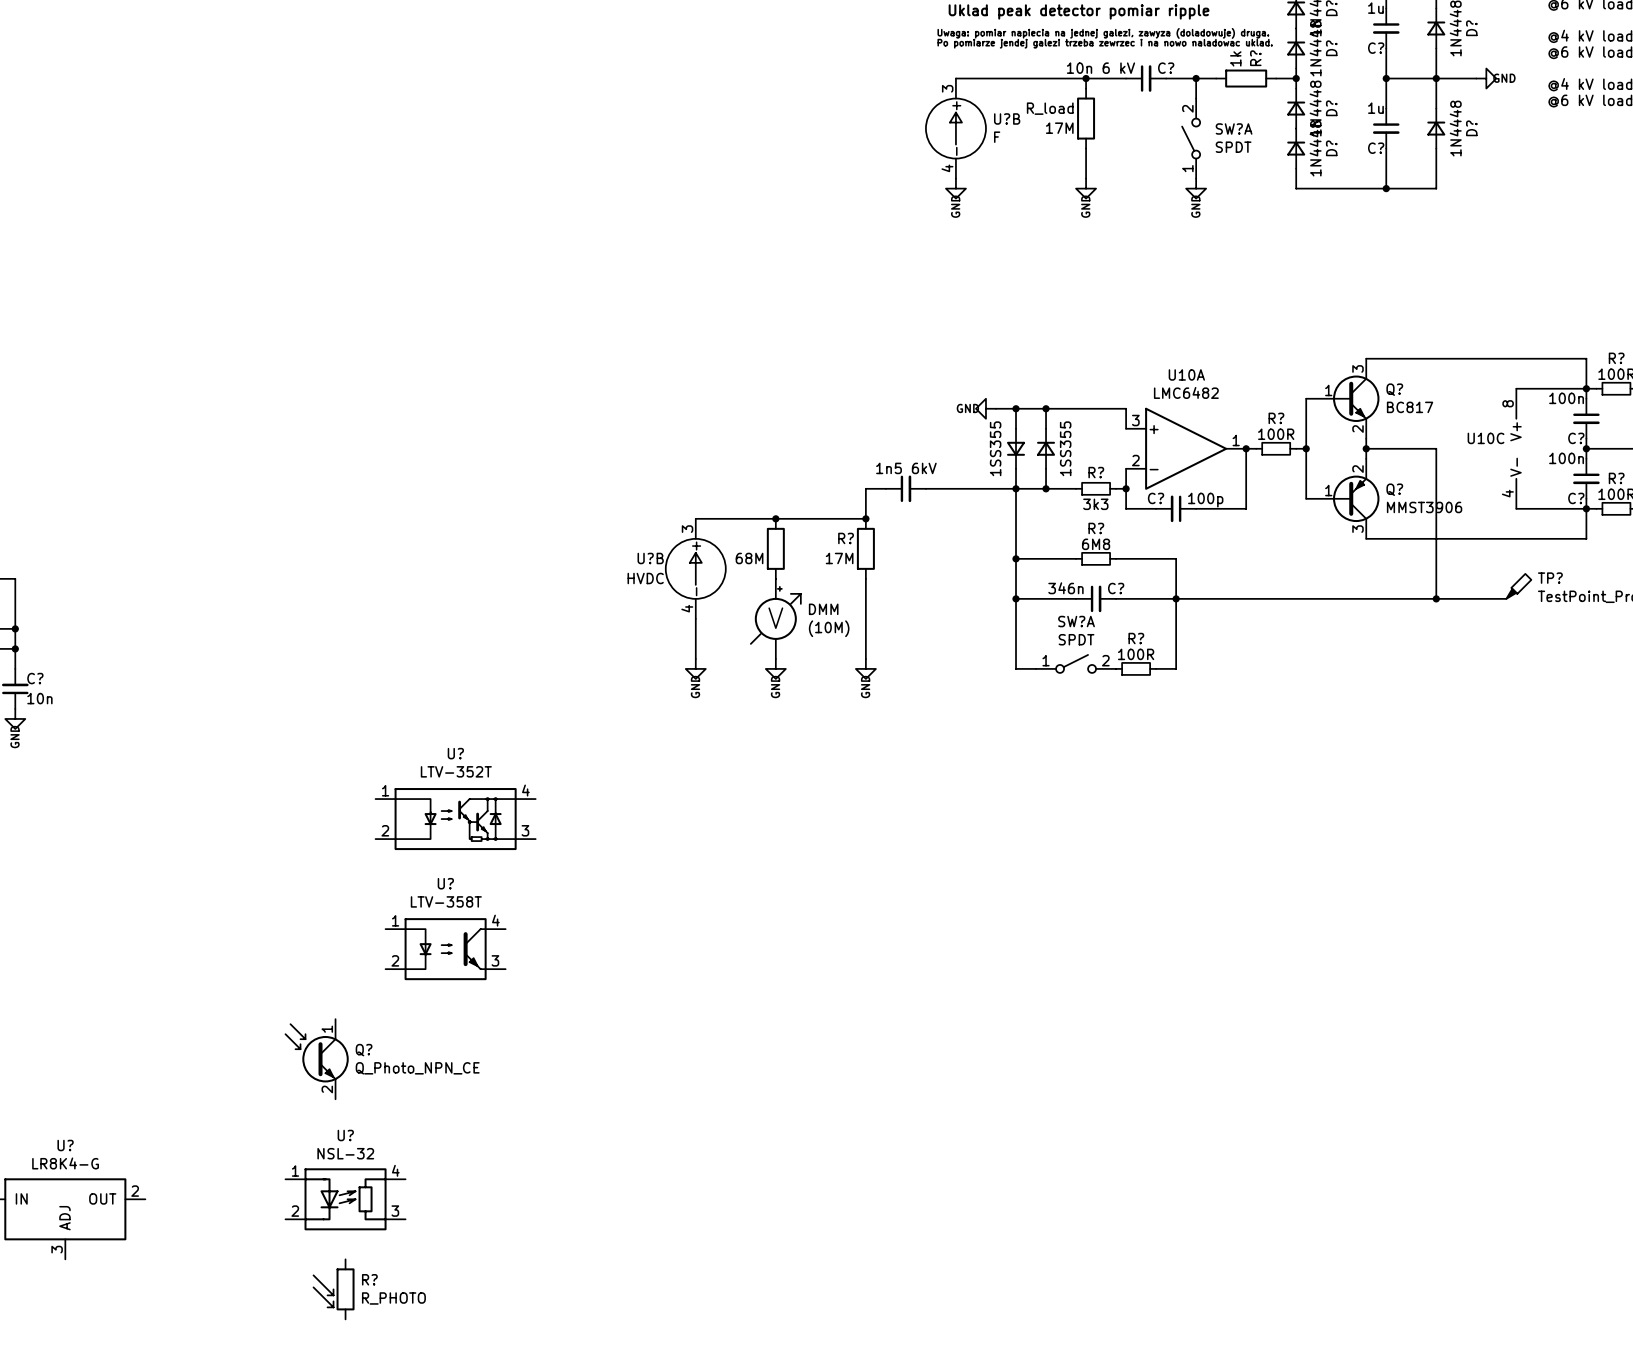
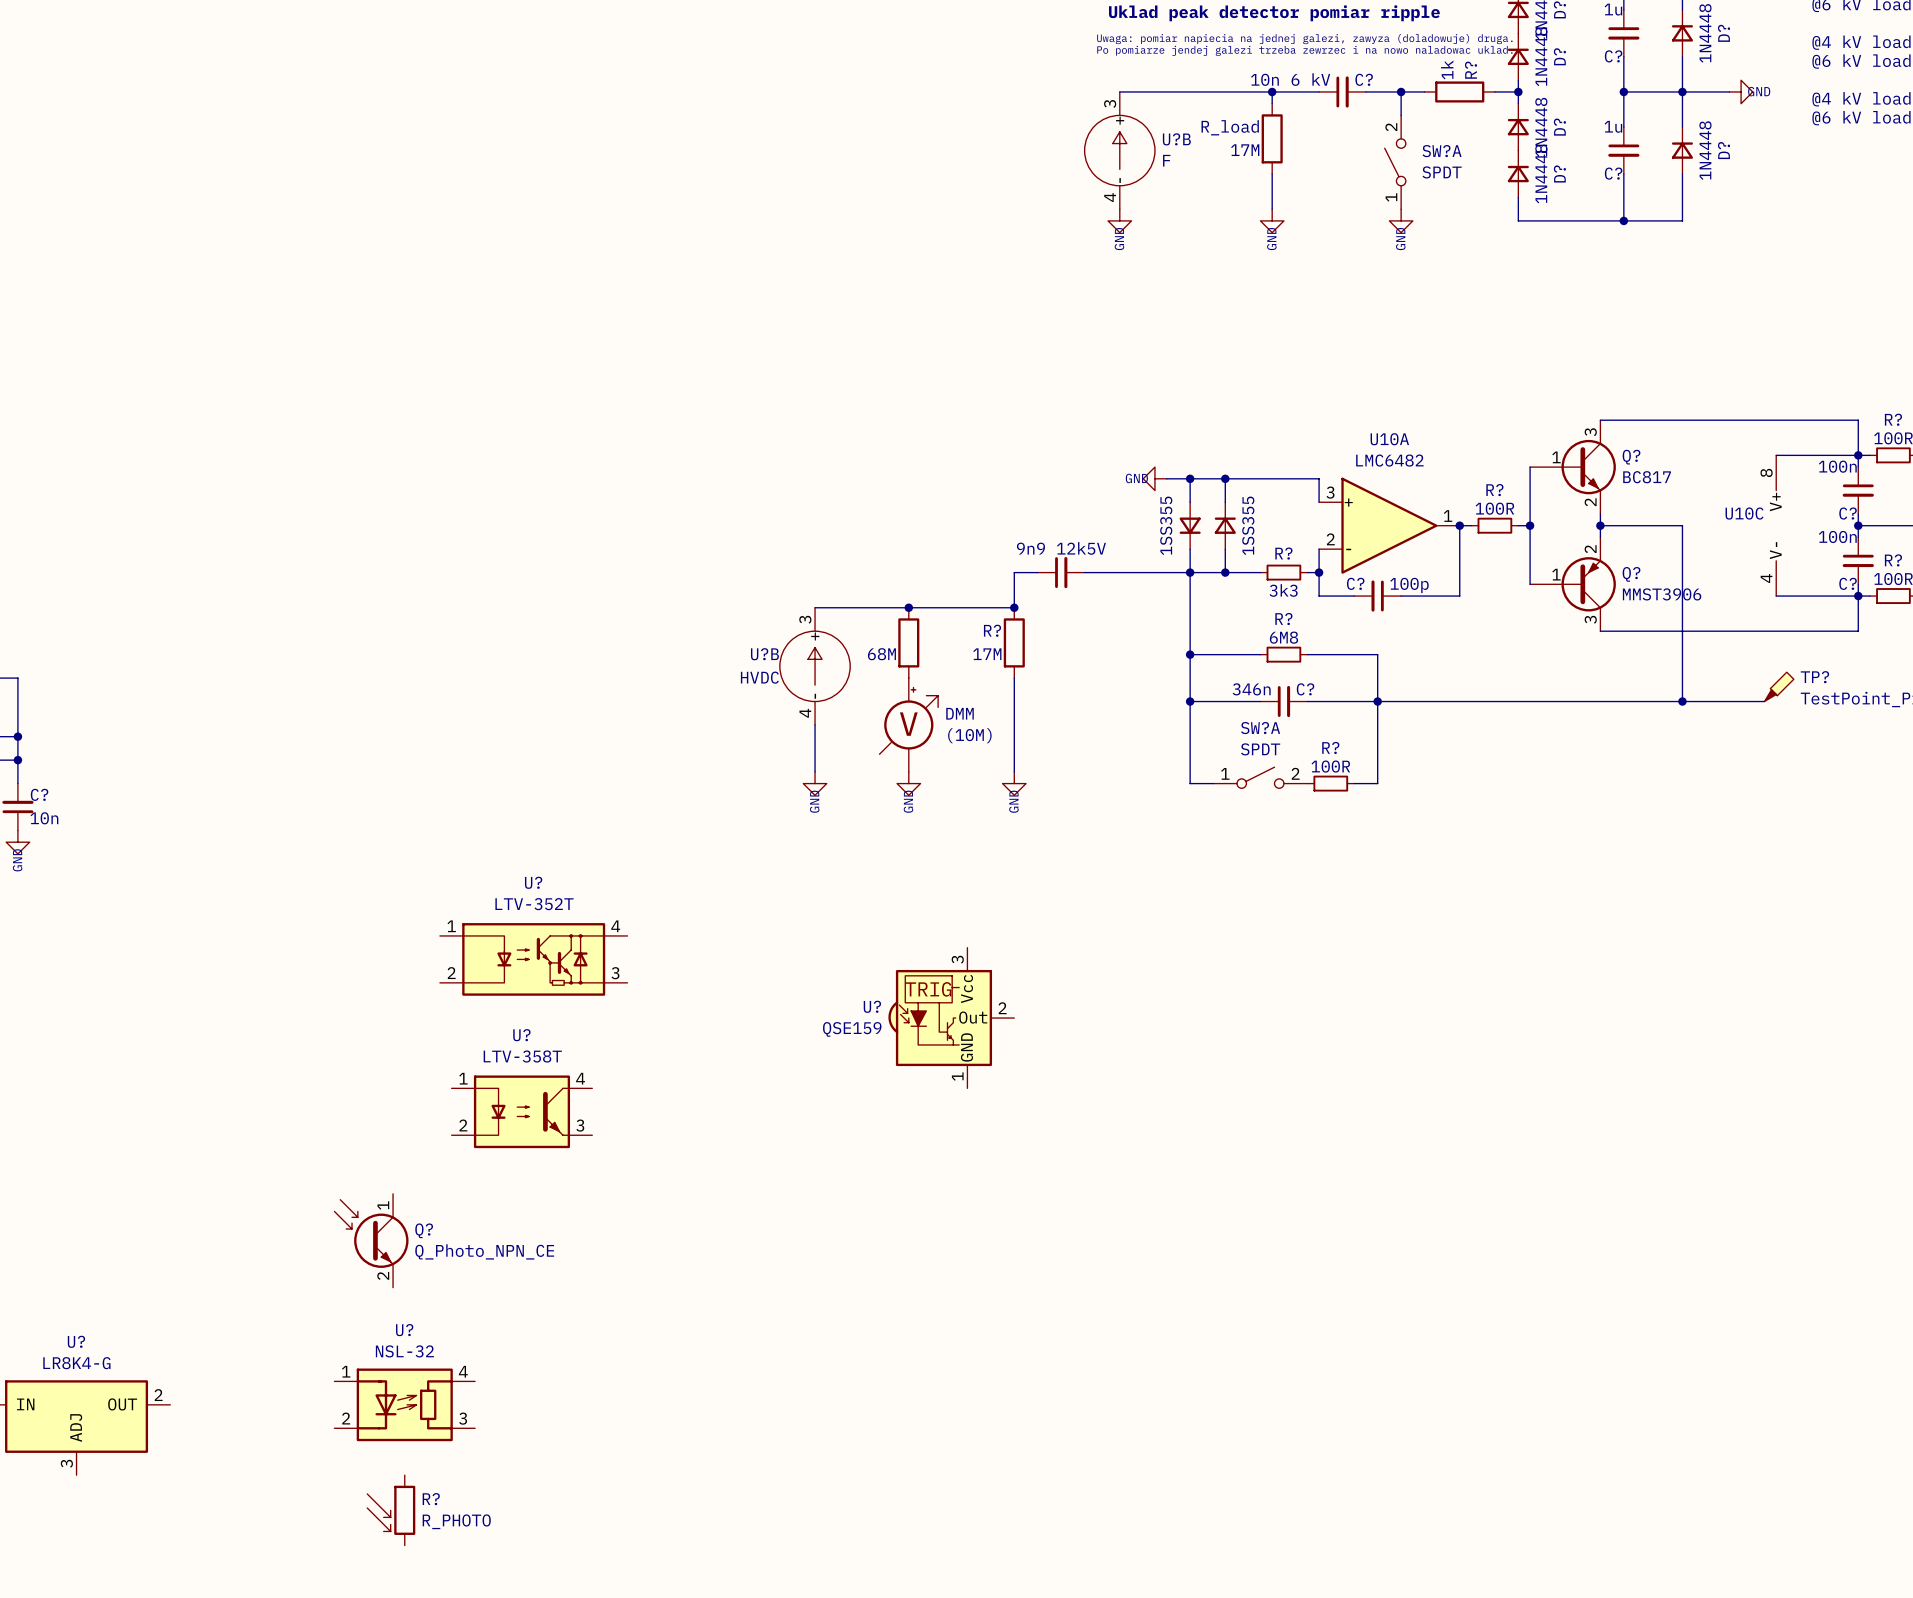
part value: 1n5 6kV (906, 468) -> 9n9 12k5V (1061, 548)
U?: none -> QSE159 (951, 1018)

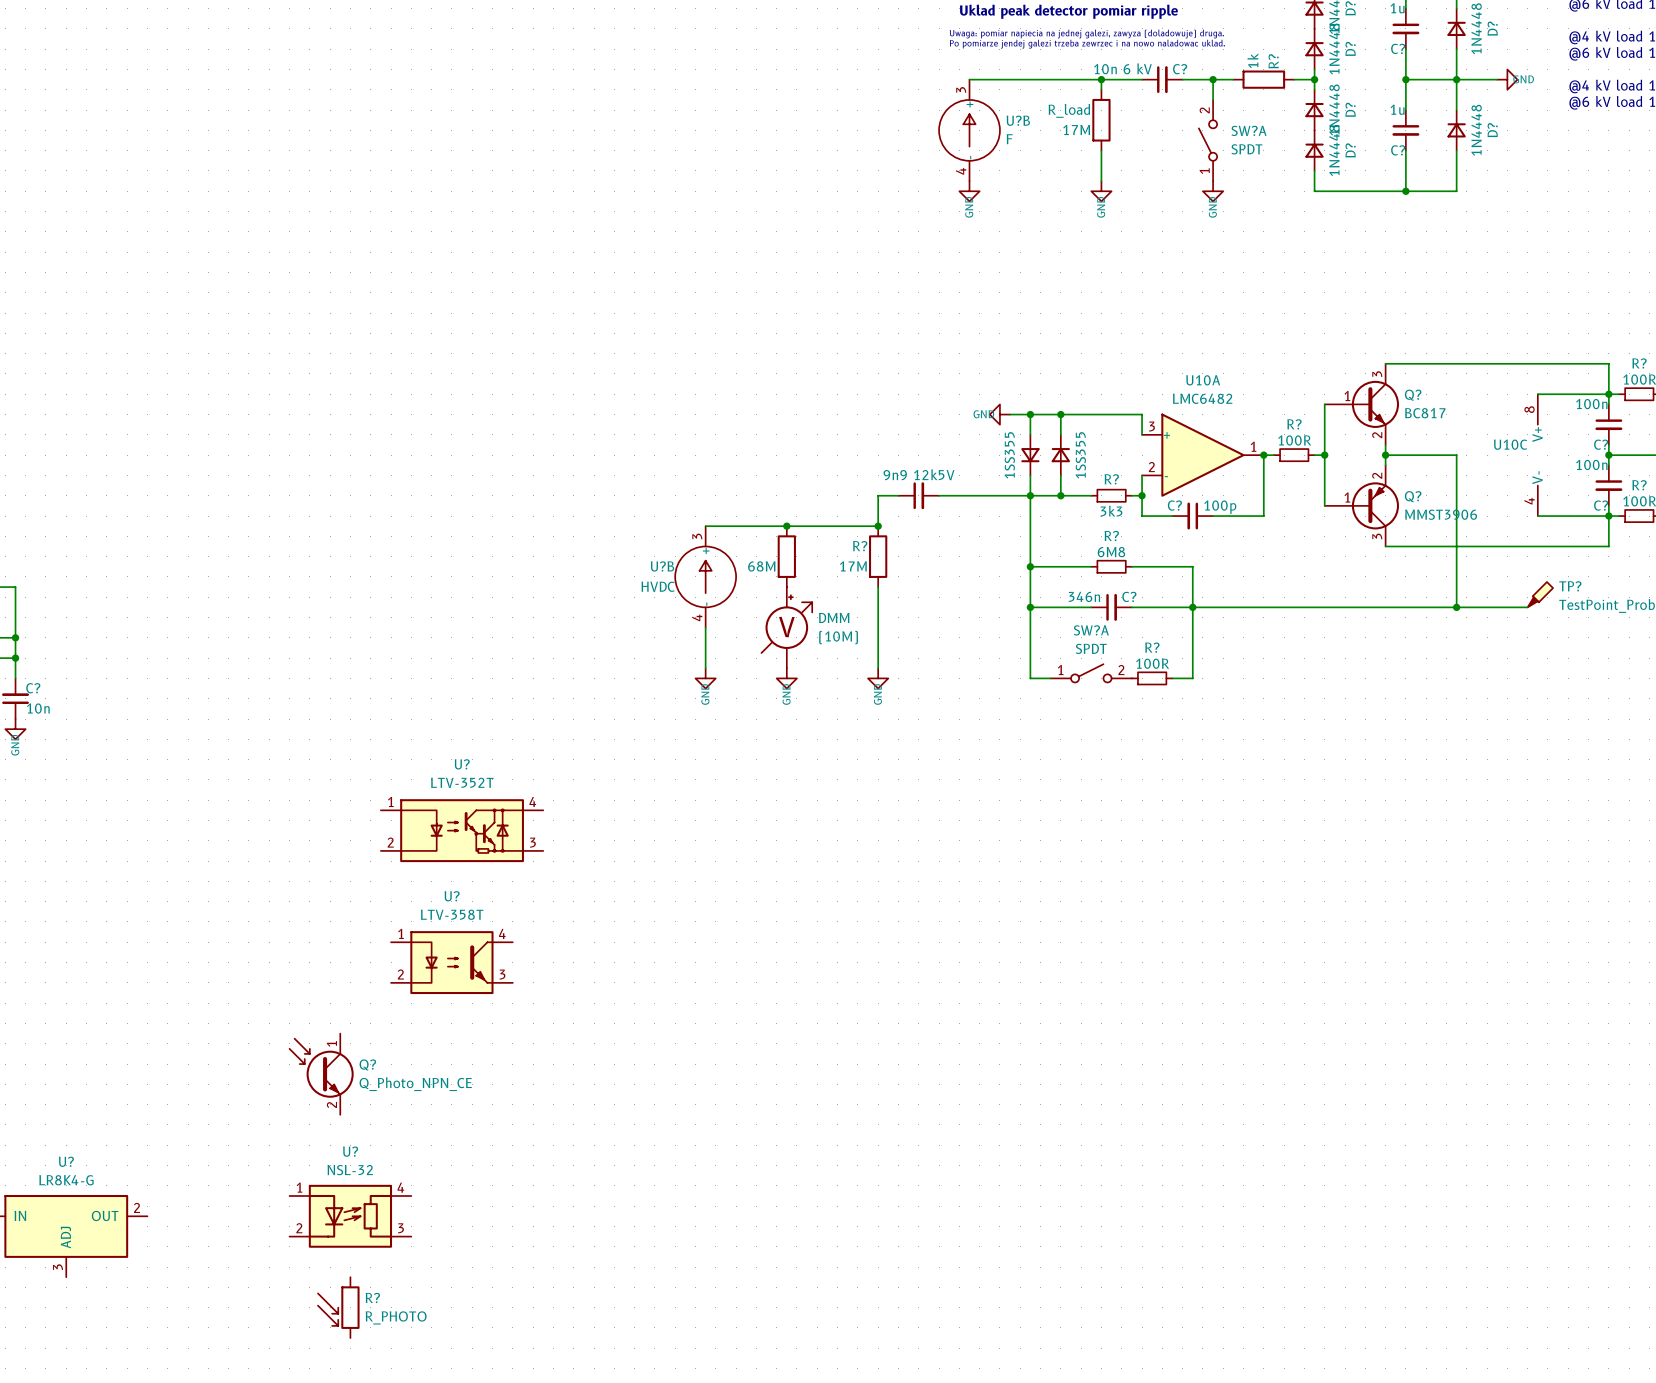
U?: QSE159 (951, 1018) -> none

